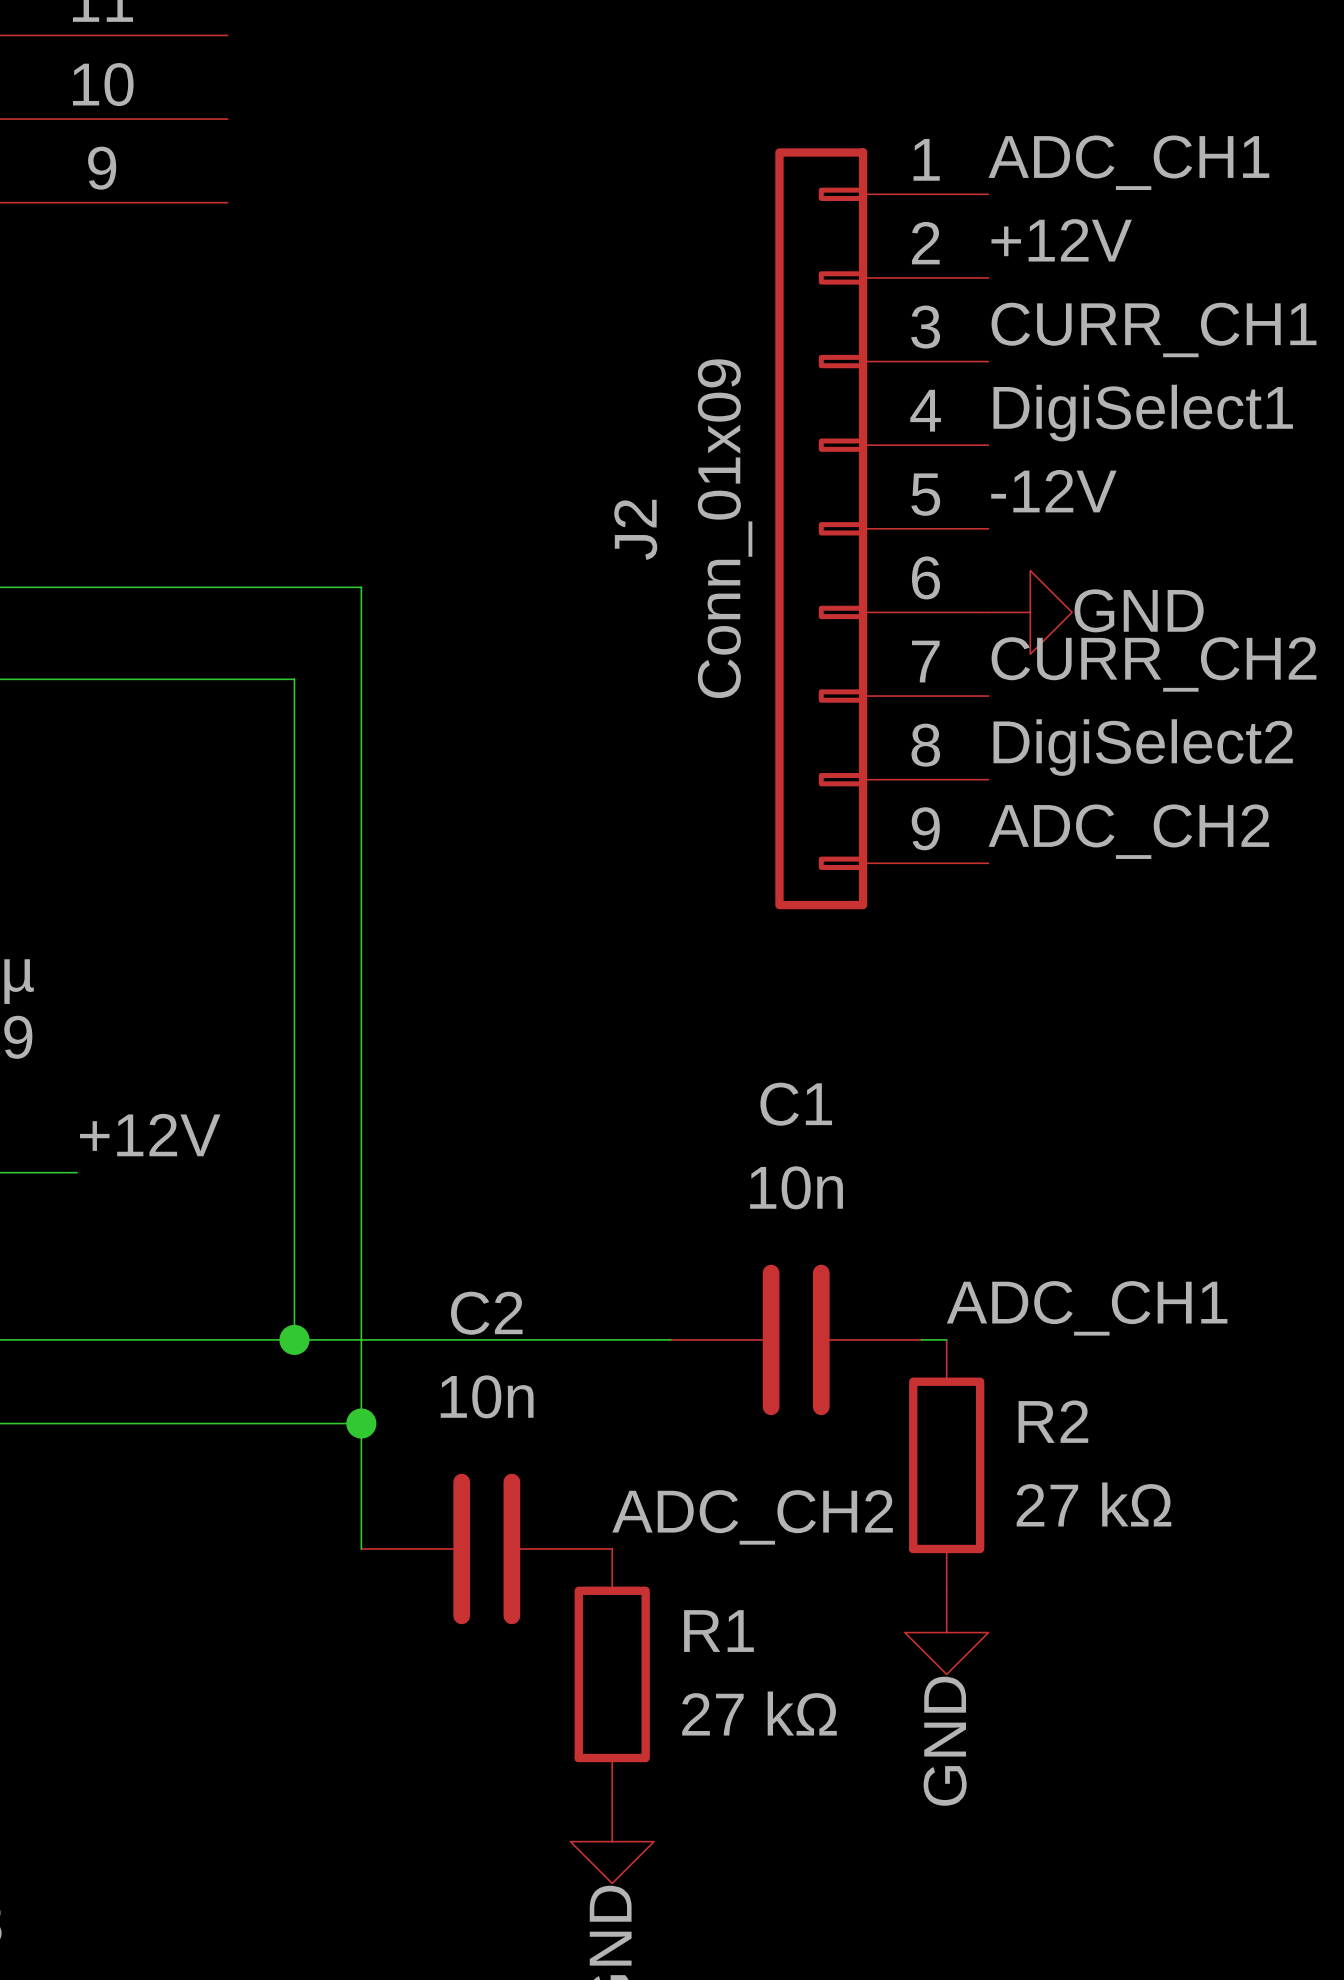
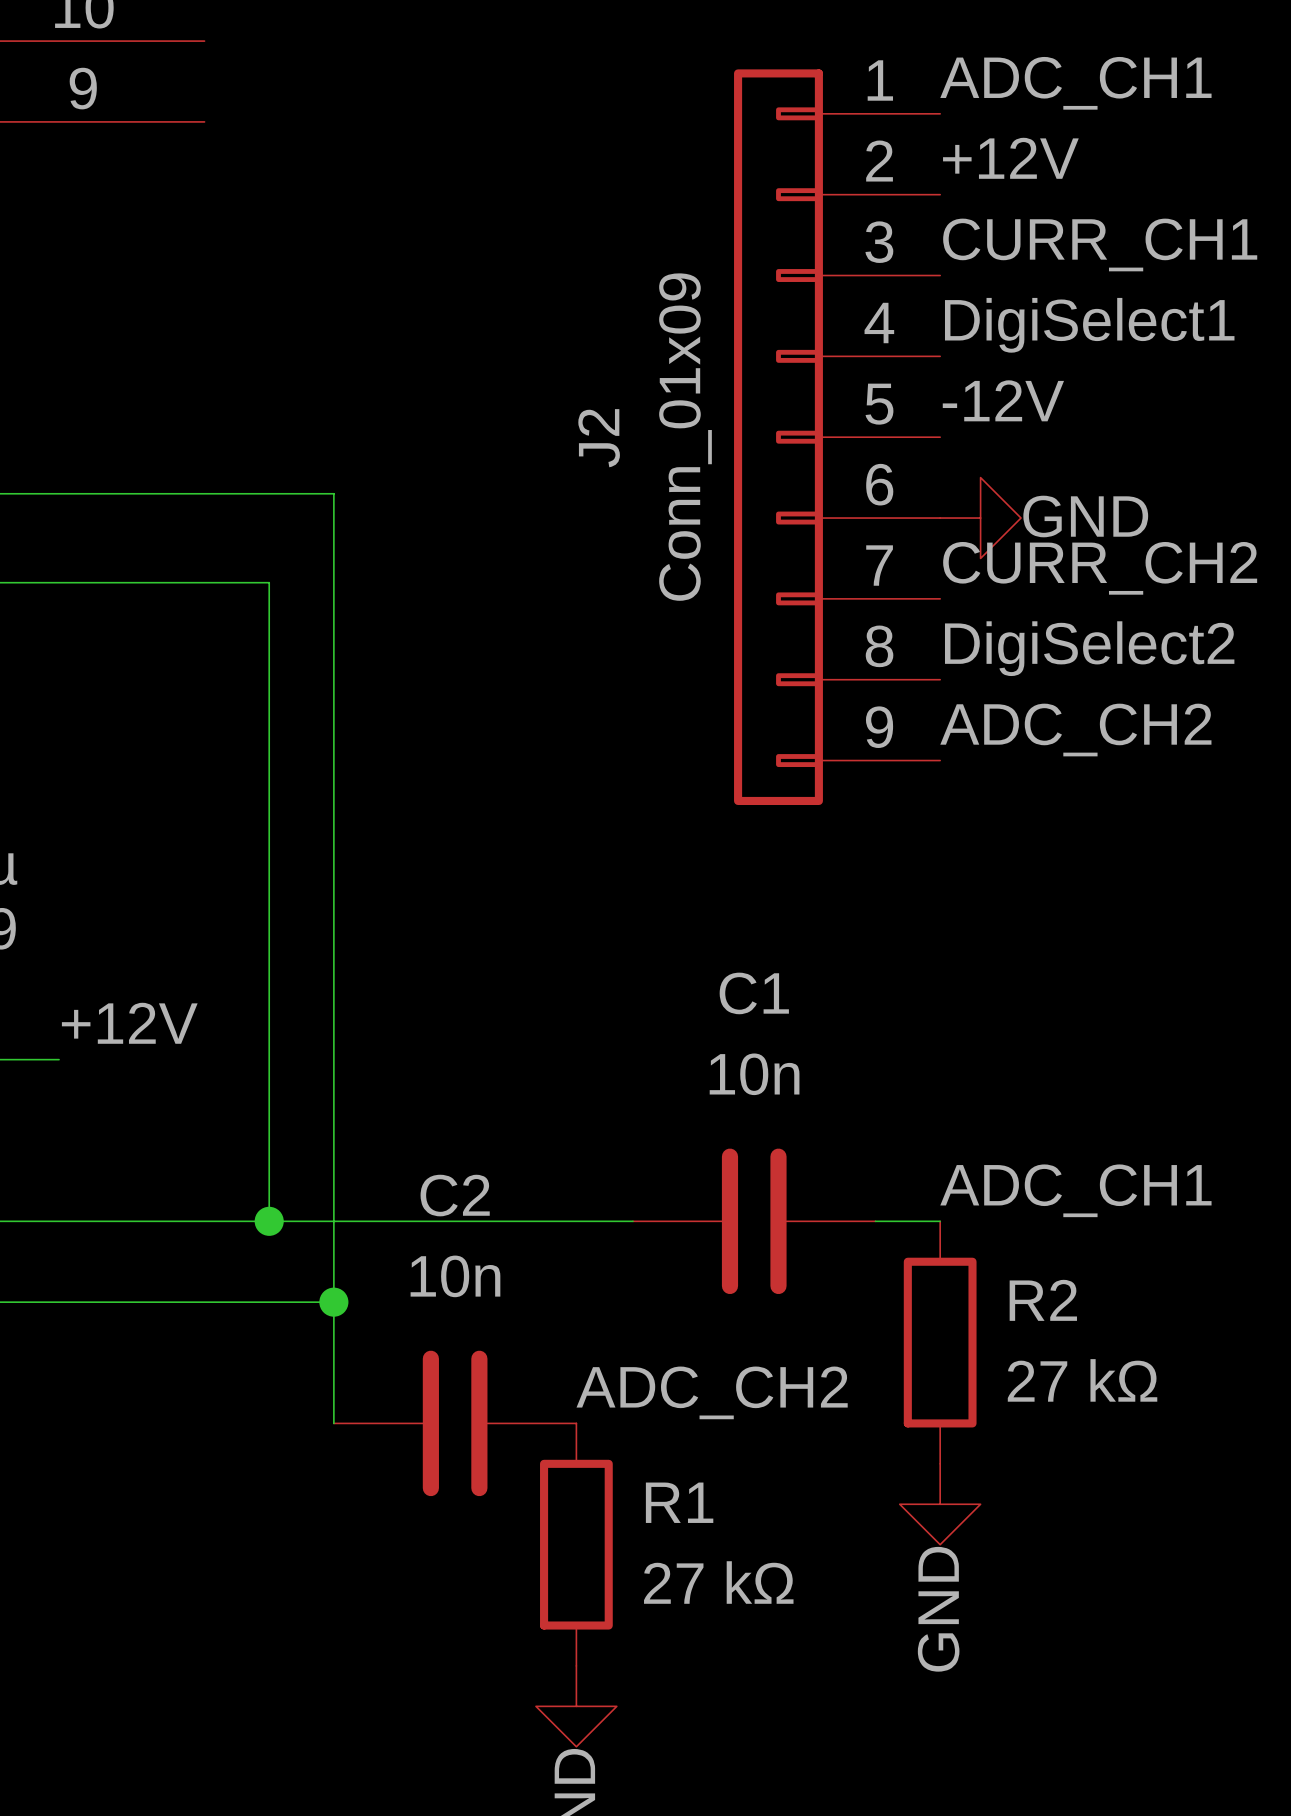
label position: ADC_CH1 (1087, 1308) -> ADC_CH1 (1075, 1190)
wire: none -> (899, 1221) (940, 1221)
R2 position: (946, 1465) -> (940, 1342)
power symbol position: GND (946, 1632) -> GND (940, 1504)

